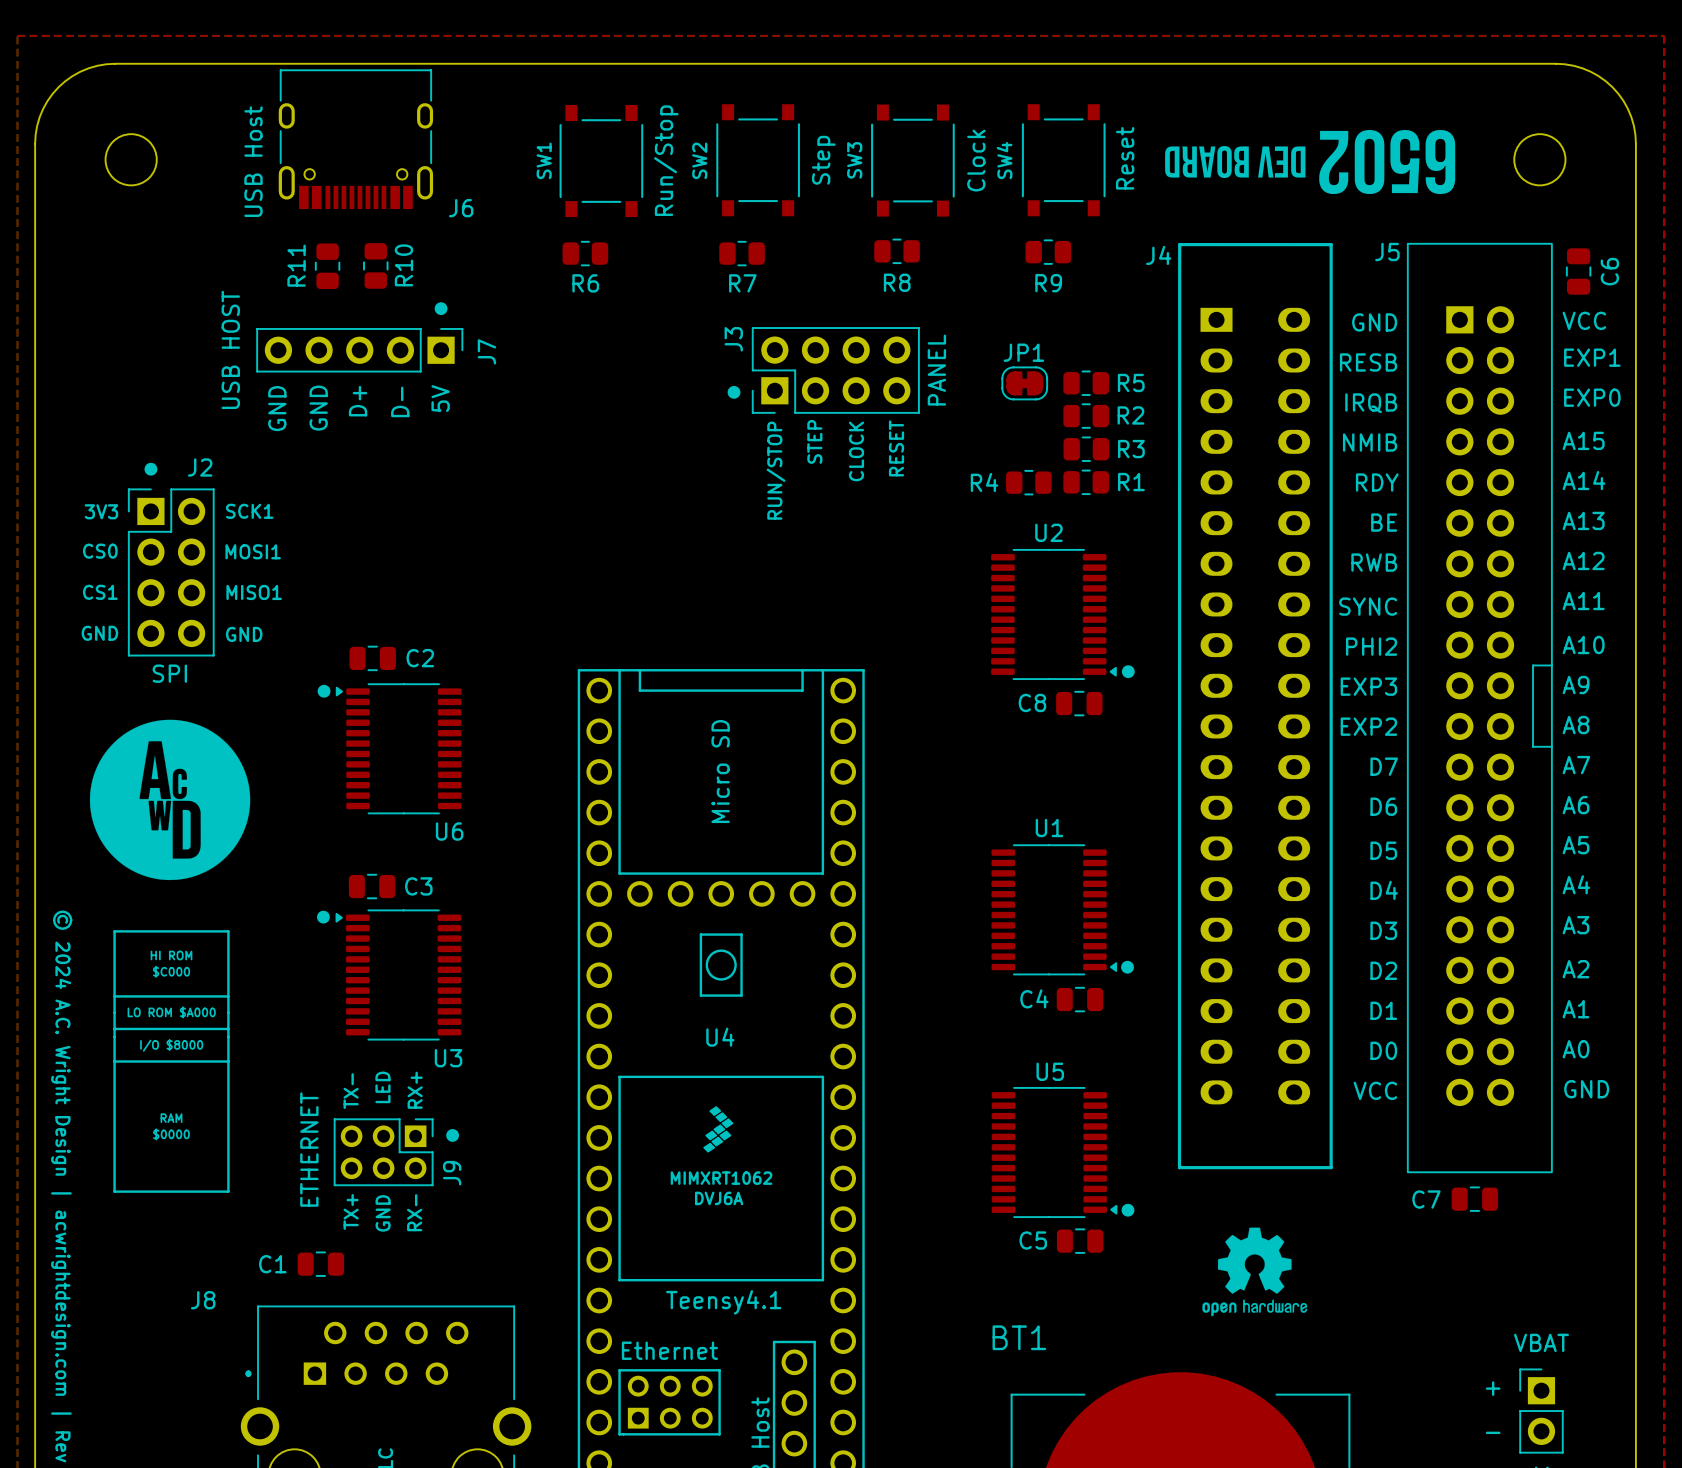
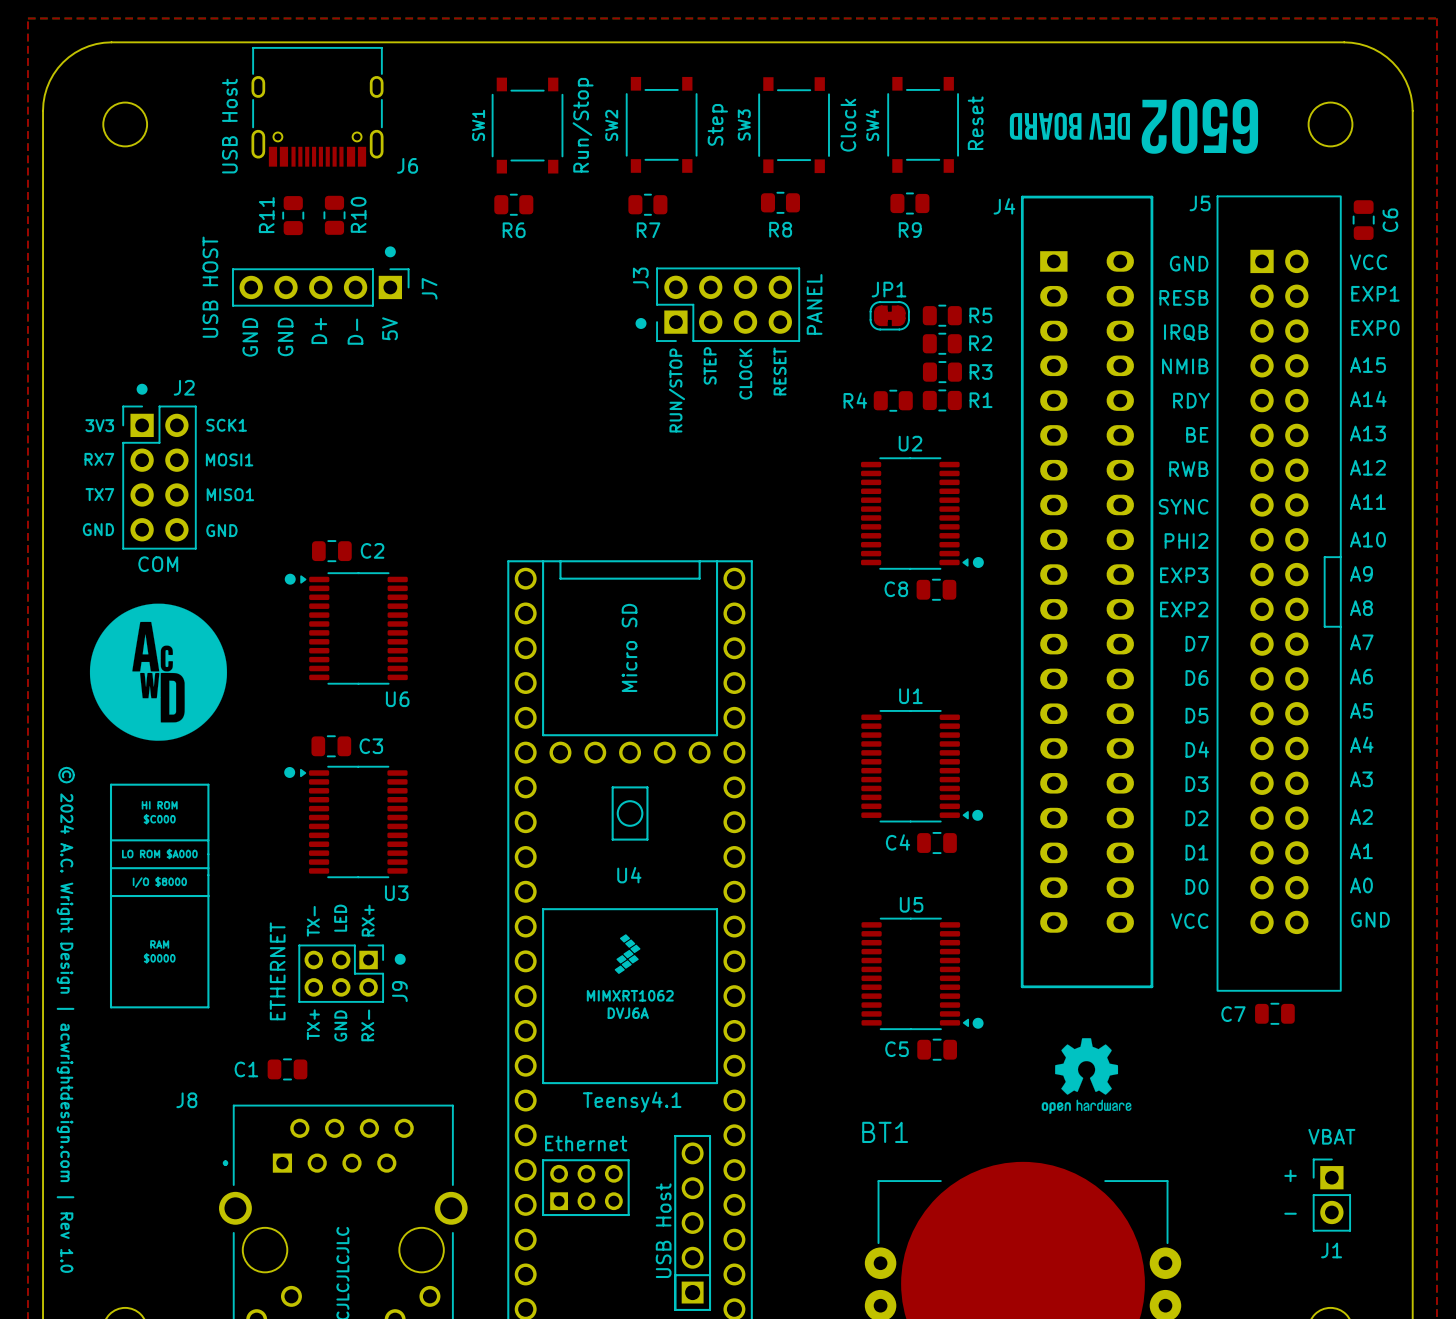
text: CS0 (100, 551) -> RX7 (99, 459)
text: CS1 (100, 592) -> TX7 (99, 494)
J2 value: SPI (169, 673) -> COM (158, 564)

